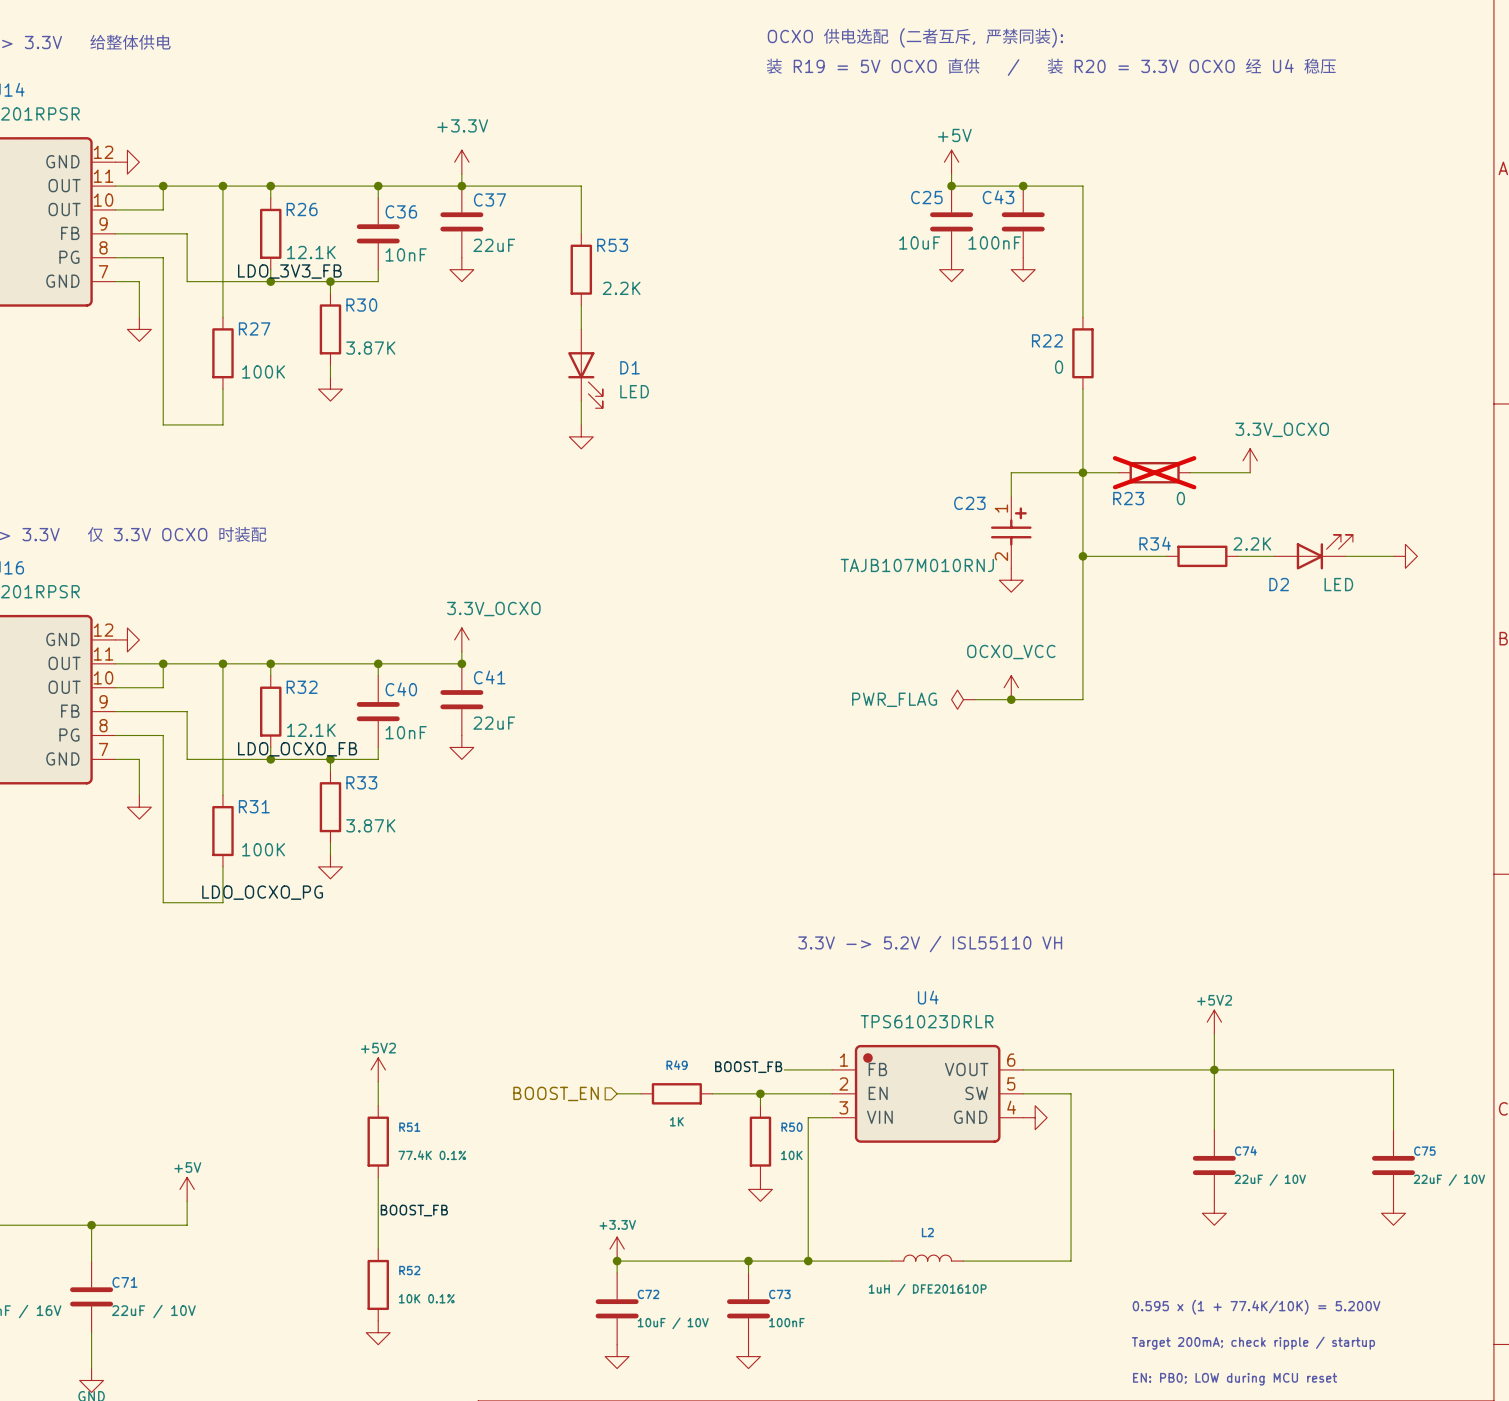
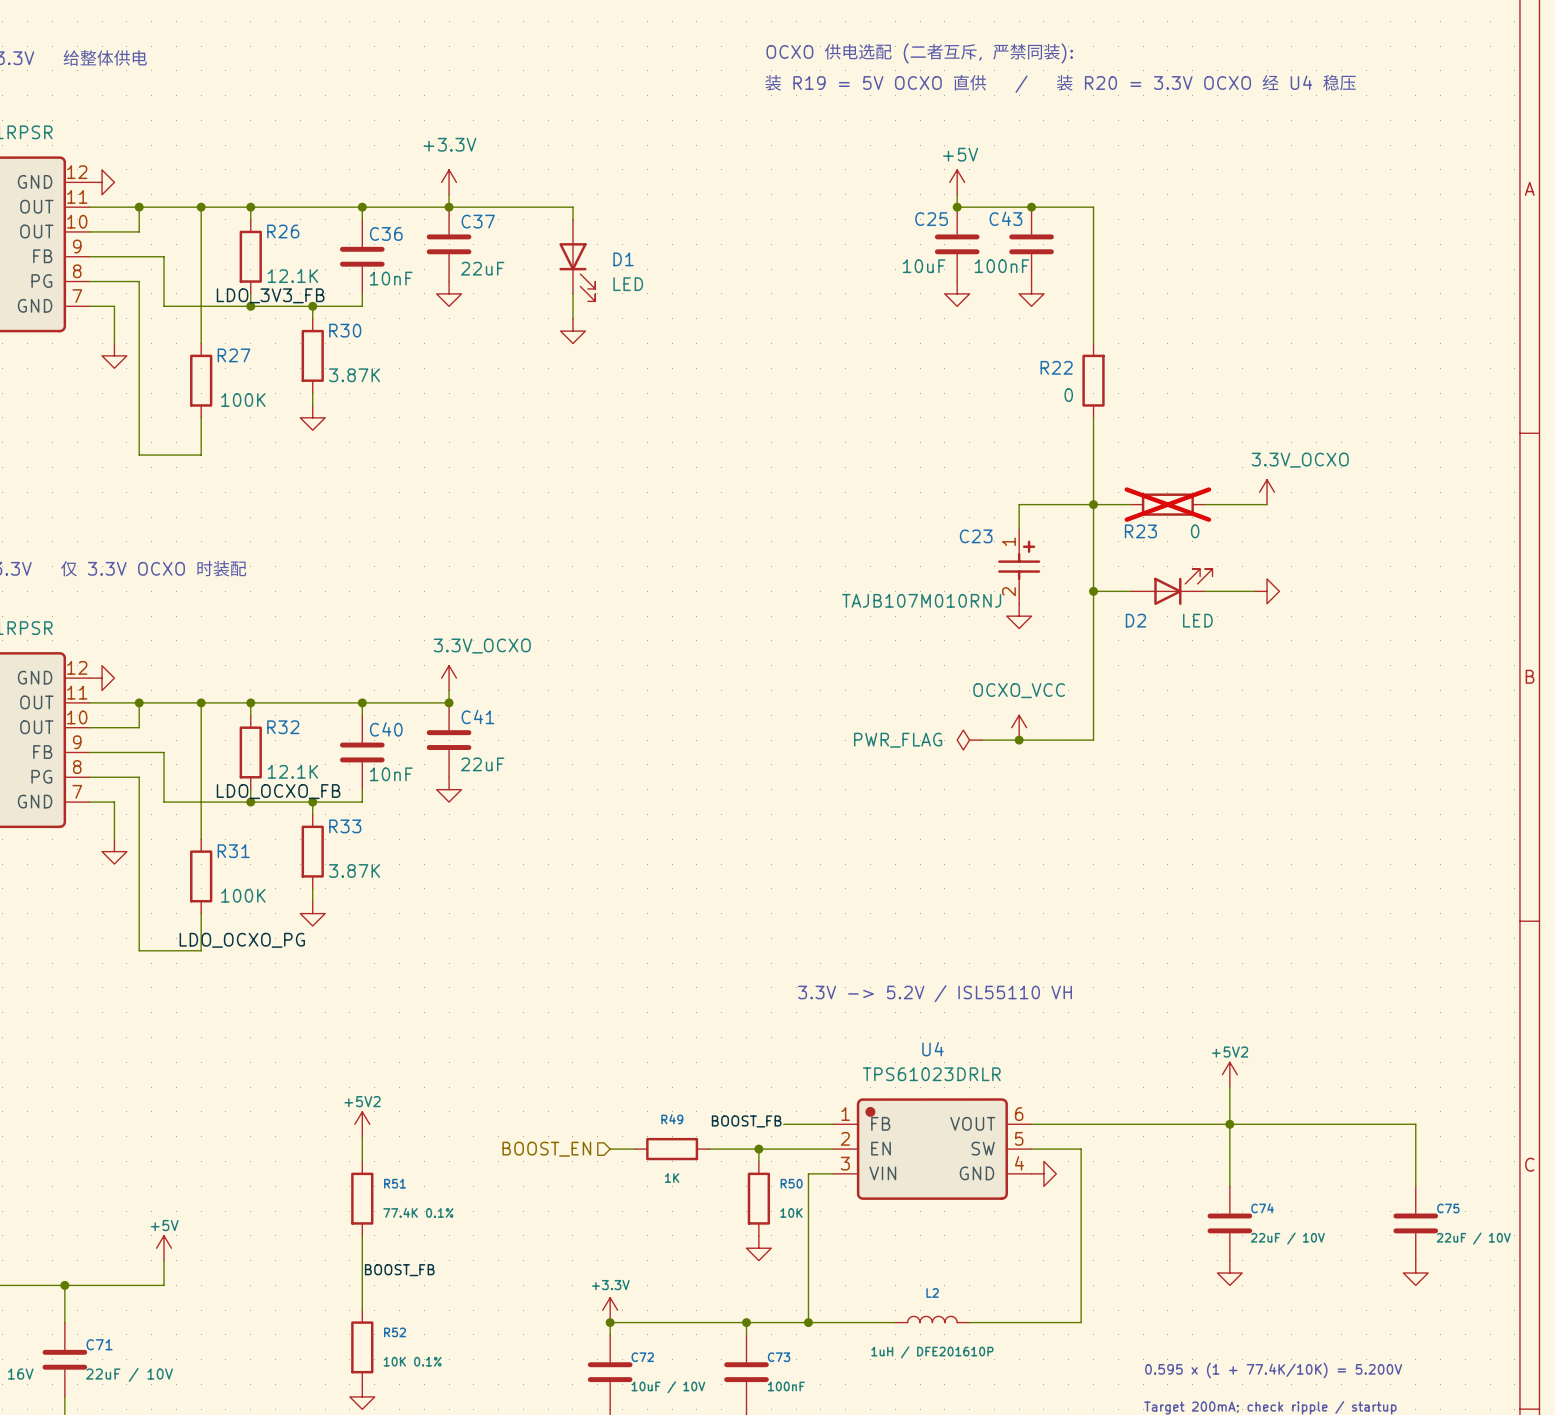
R53: 2.2K (581, 269) -> none
wire: (581, 305) (581, 329) -> (572, 293) (572, 318)
D1 position: (585, 368) -> (577, 260)
wire: (581, 401) (581, 424) -> none
power symbol position: (581, 436) -> (572, 331)
D2 position: (1313, 552) -> (1171, 587)
R34: 2.2K (1202, 556) -> none
wire: (1238, 556) (1274, 556) -> (1254, 591) (1205, 591)
wire: (1345, 556) (1393, 556) -> none
power symbol position: (1405, 556) -> (1267, 591)

